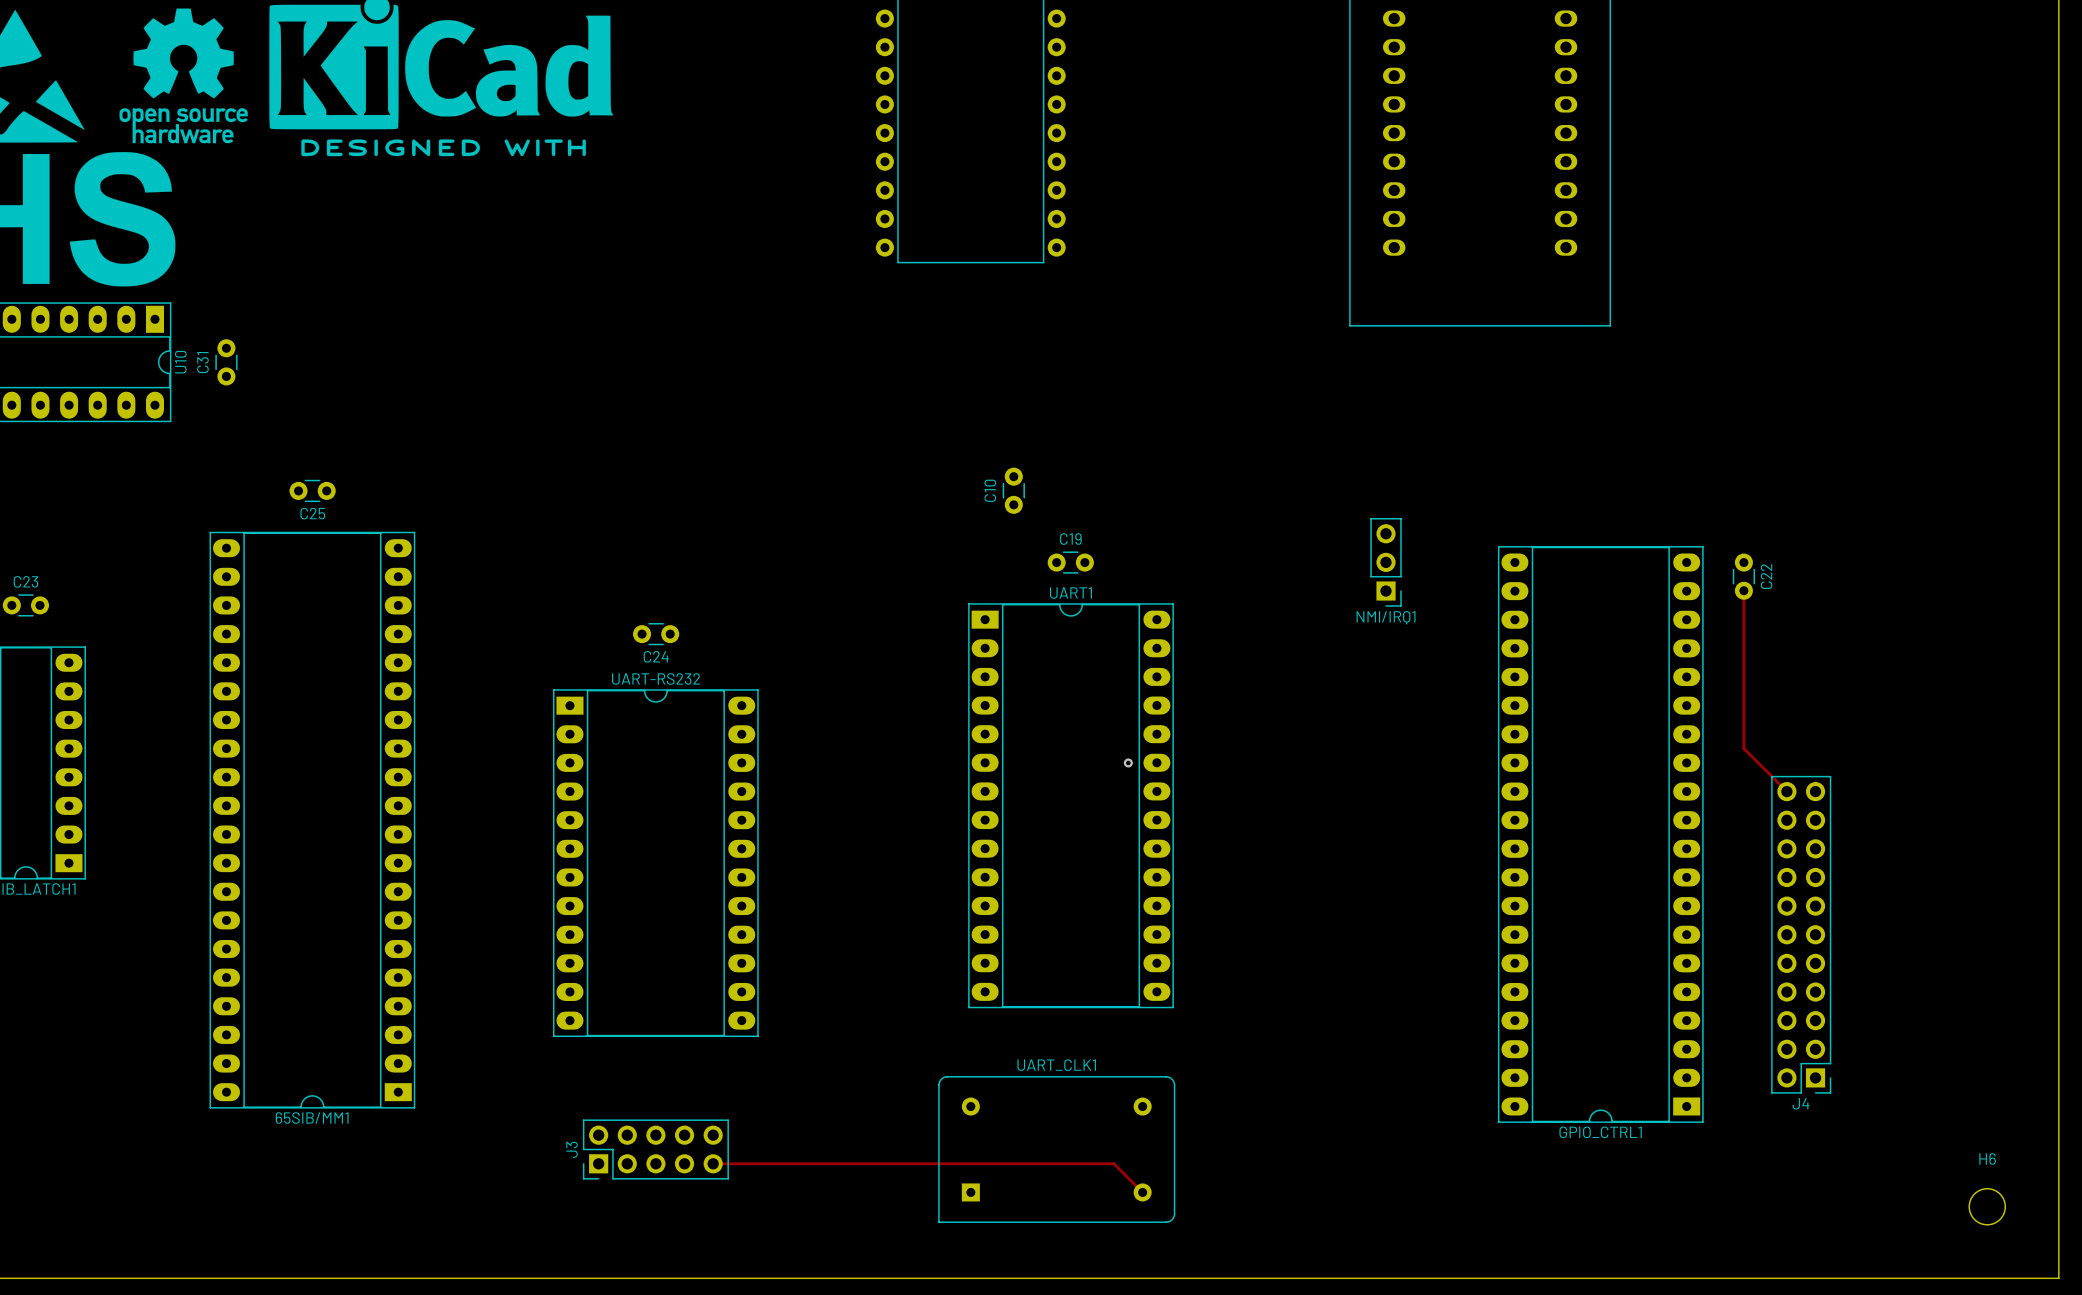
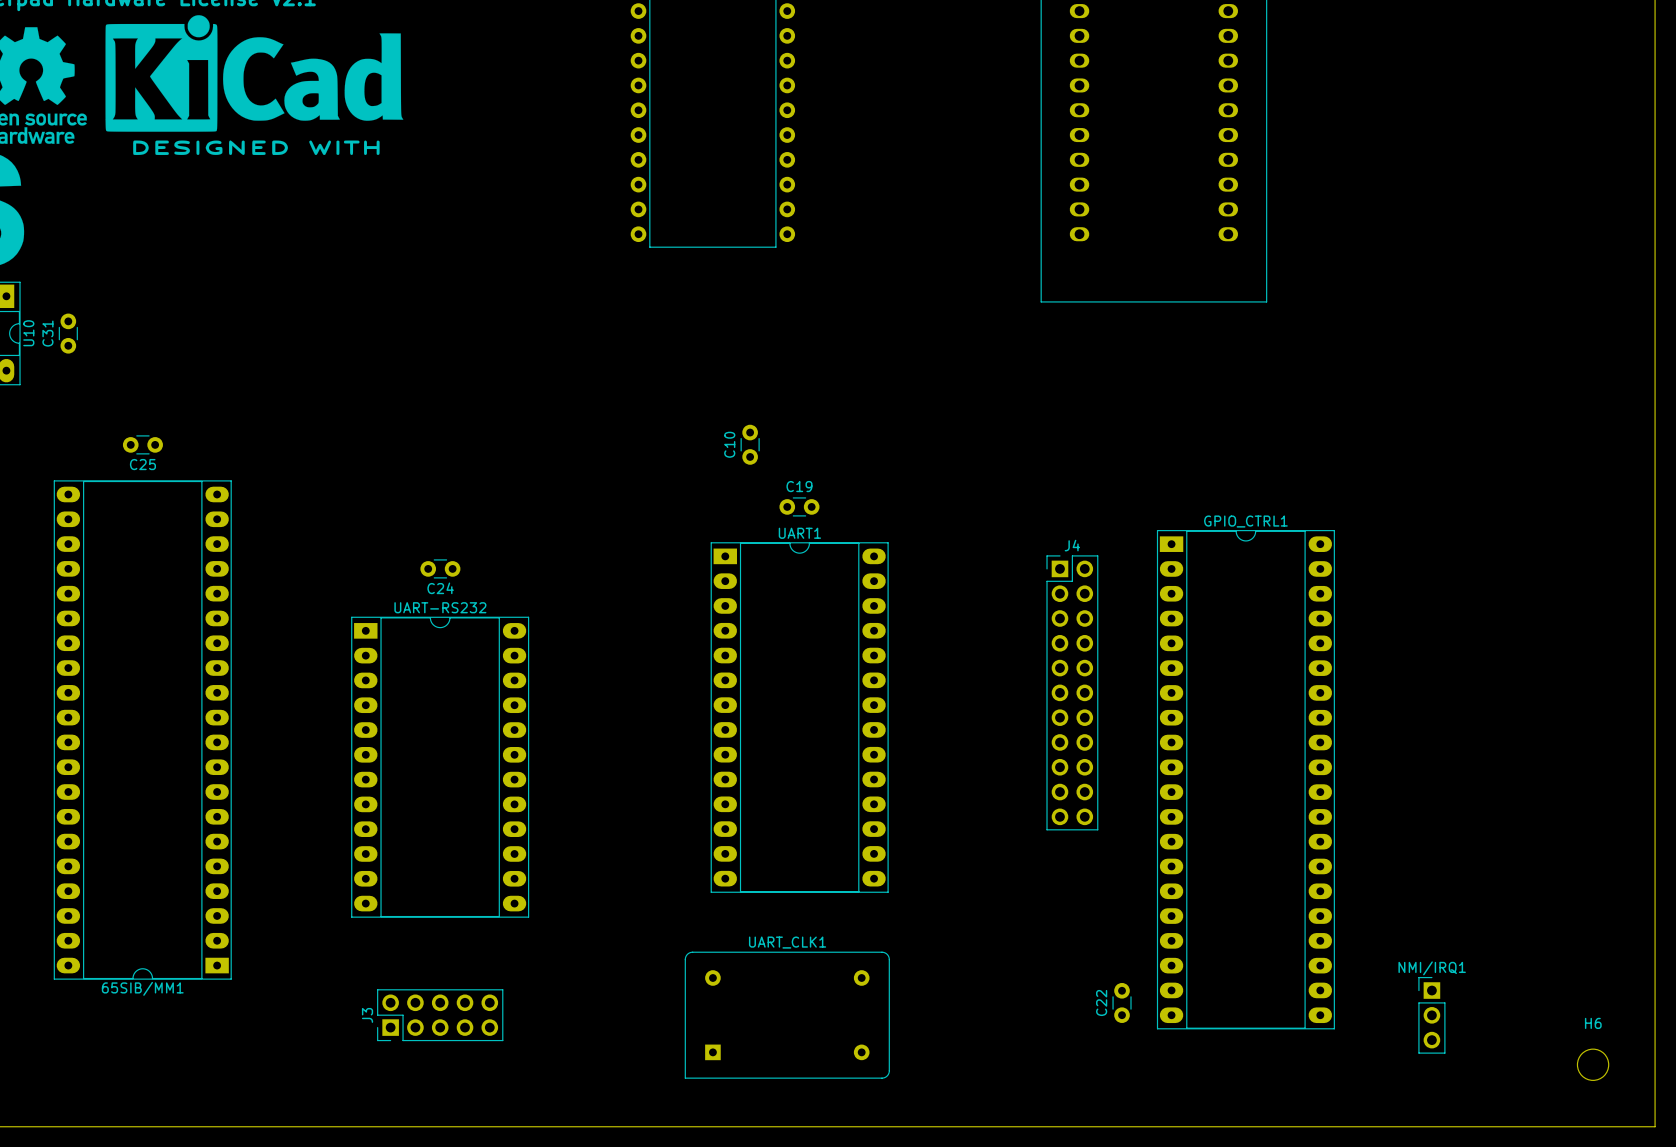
NMI/IRQ1 rotation: 0° (1386, 562) -> 180° (1431, 1015)
NMI/IRQ1 position: (1386, 562) -> (1431, 1015)
C22 position: (1743, 576) -> (1122, 1002)
C22 name position: C22 (1766, 576) -> C22 (1101, 1002)
track: (1743, 590) (1743, 748) (1786, 791) -> none
via: (1128, 762) -> none
GPIO_CTRL1 rotation: 0° (1600, 834) -> 180° (1245, 779)
J4 rotation: 0° (1801, 934) -> 180° (1072, 692)
J4 position: (1801, 934) -> (1072, 692)
track: (713, 1163) (1114, 1163) (1142, 1192) -> none

